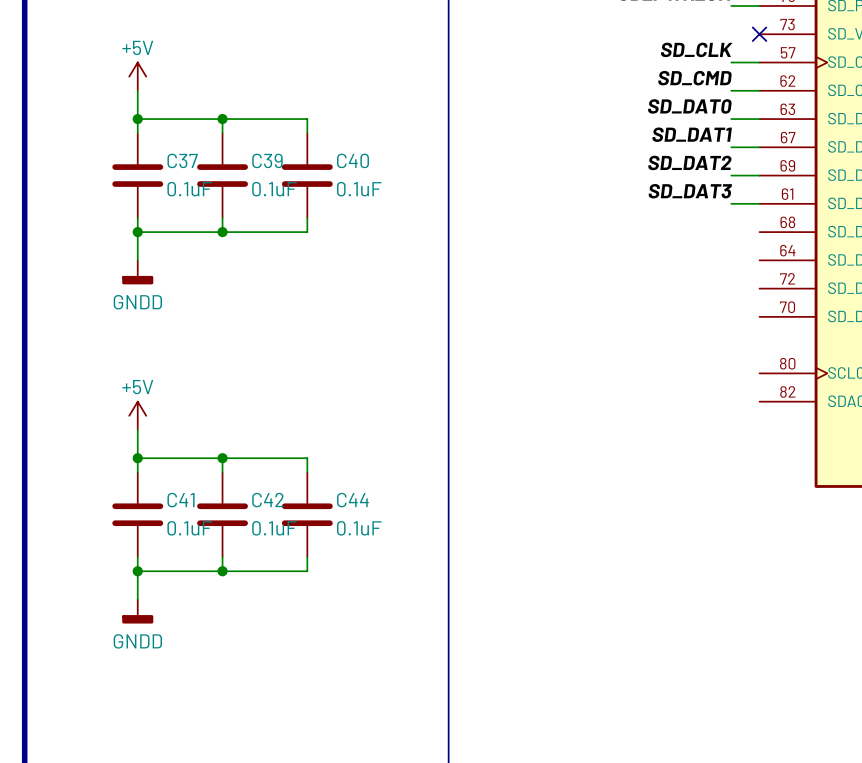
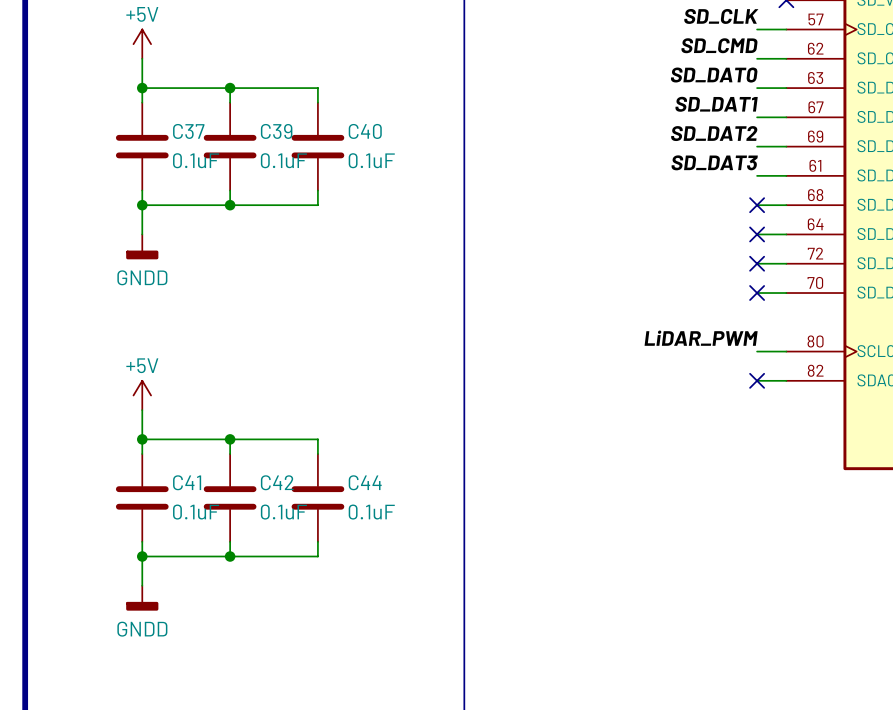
wire: none -> (757, 205) (786, 205)
no-connect mark: none -> (757, 205)
wire: none -> (757, 234) (786, 234)
no-connect mark: none -> (757, 234)
wire: none -> (757, 263) (786, 263)
no-connect mark: none -> (757, 263)
wire: none -> (757, 293) (786, 293)
no-connect mark: none -> (757, 293)
label: none -> LiDAR_PWM (701, 338)
wire: none -> (757, 351) (786, 351)
wire: none -> (757, 380) (786, 380)
no-connect mark: none -> (757, 380)

